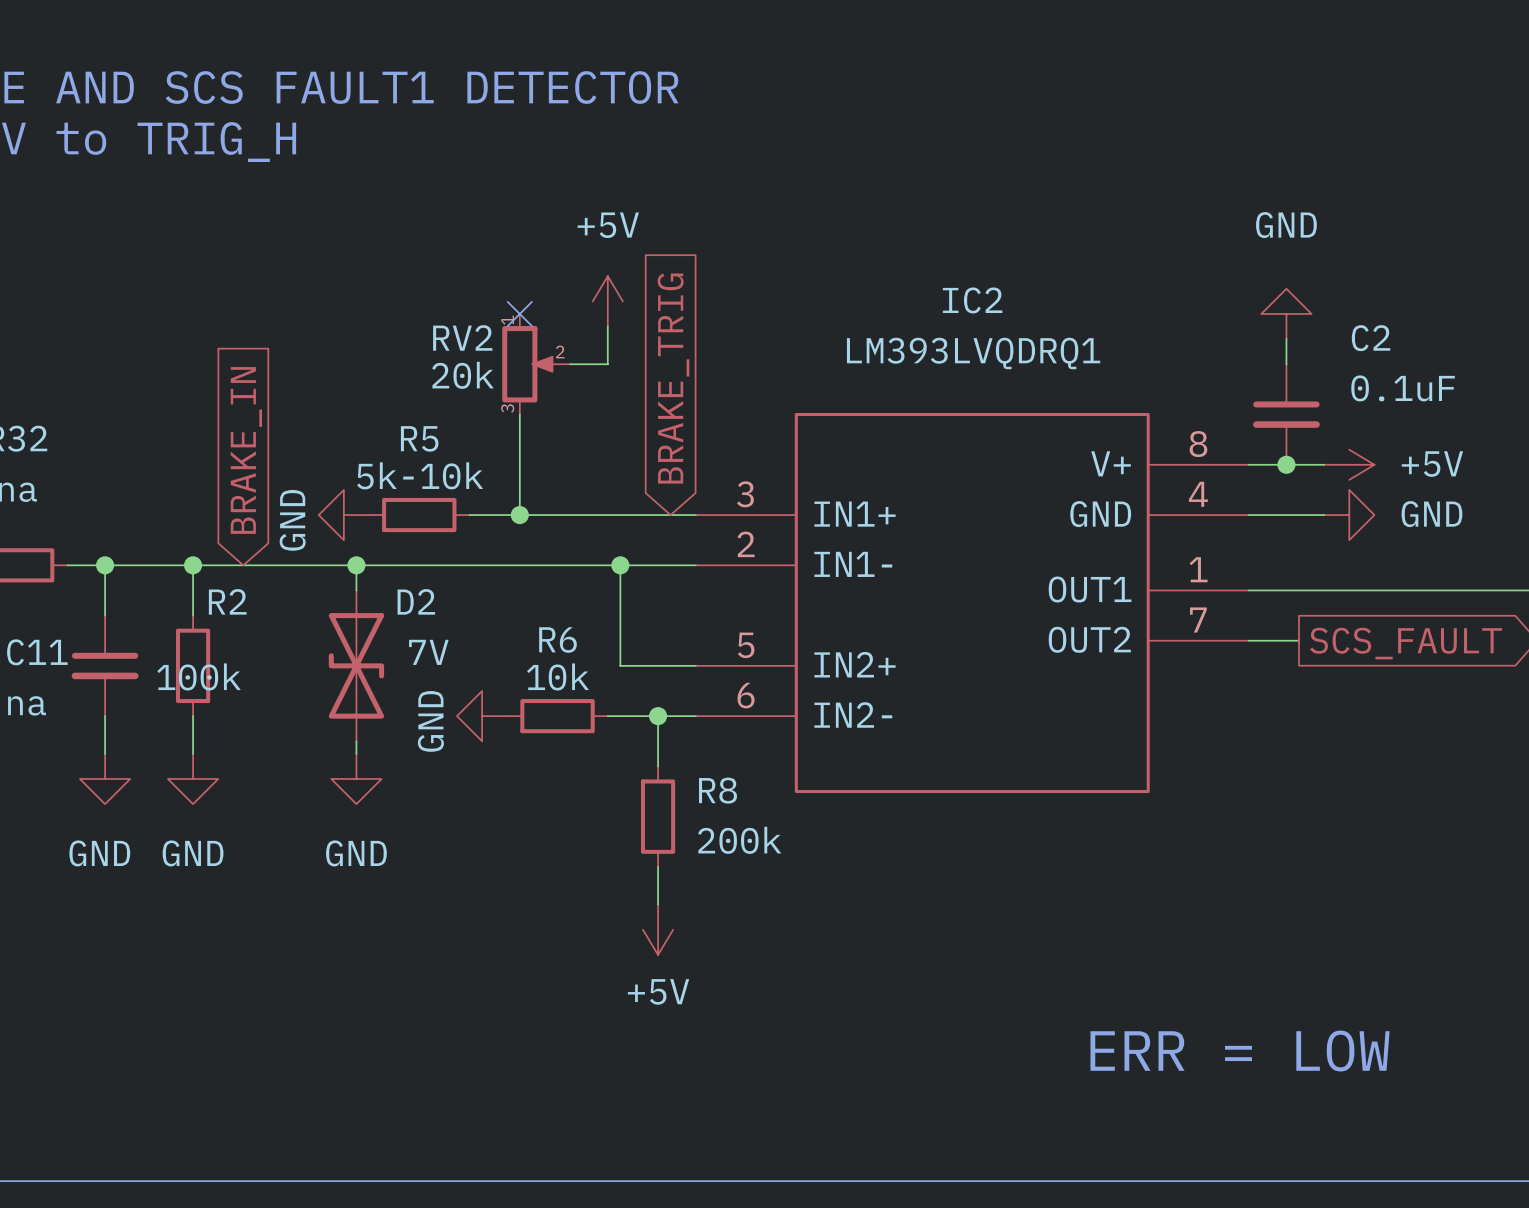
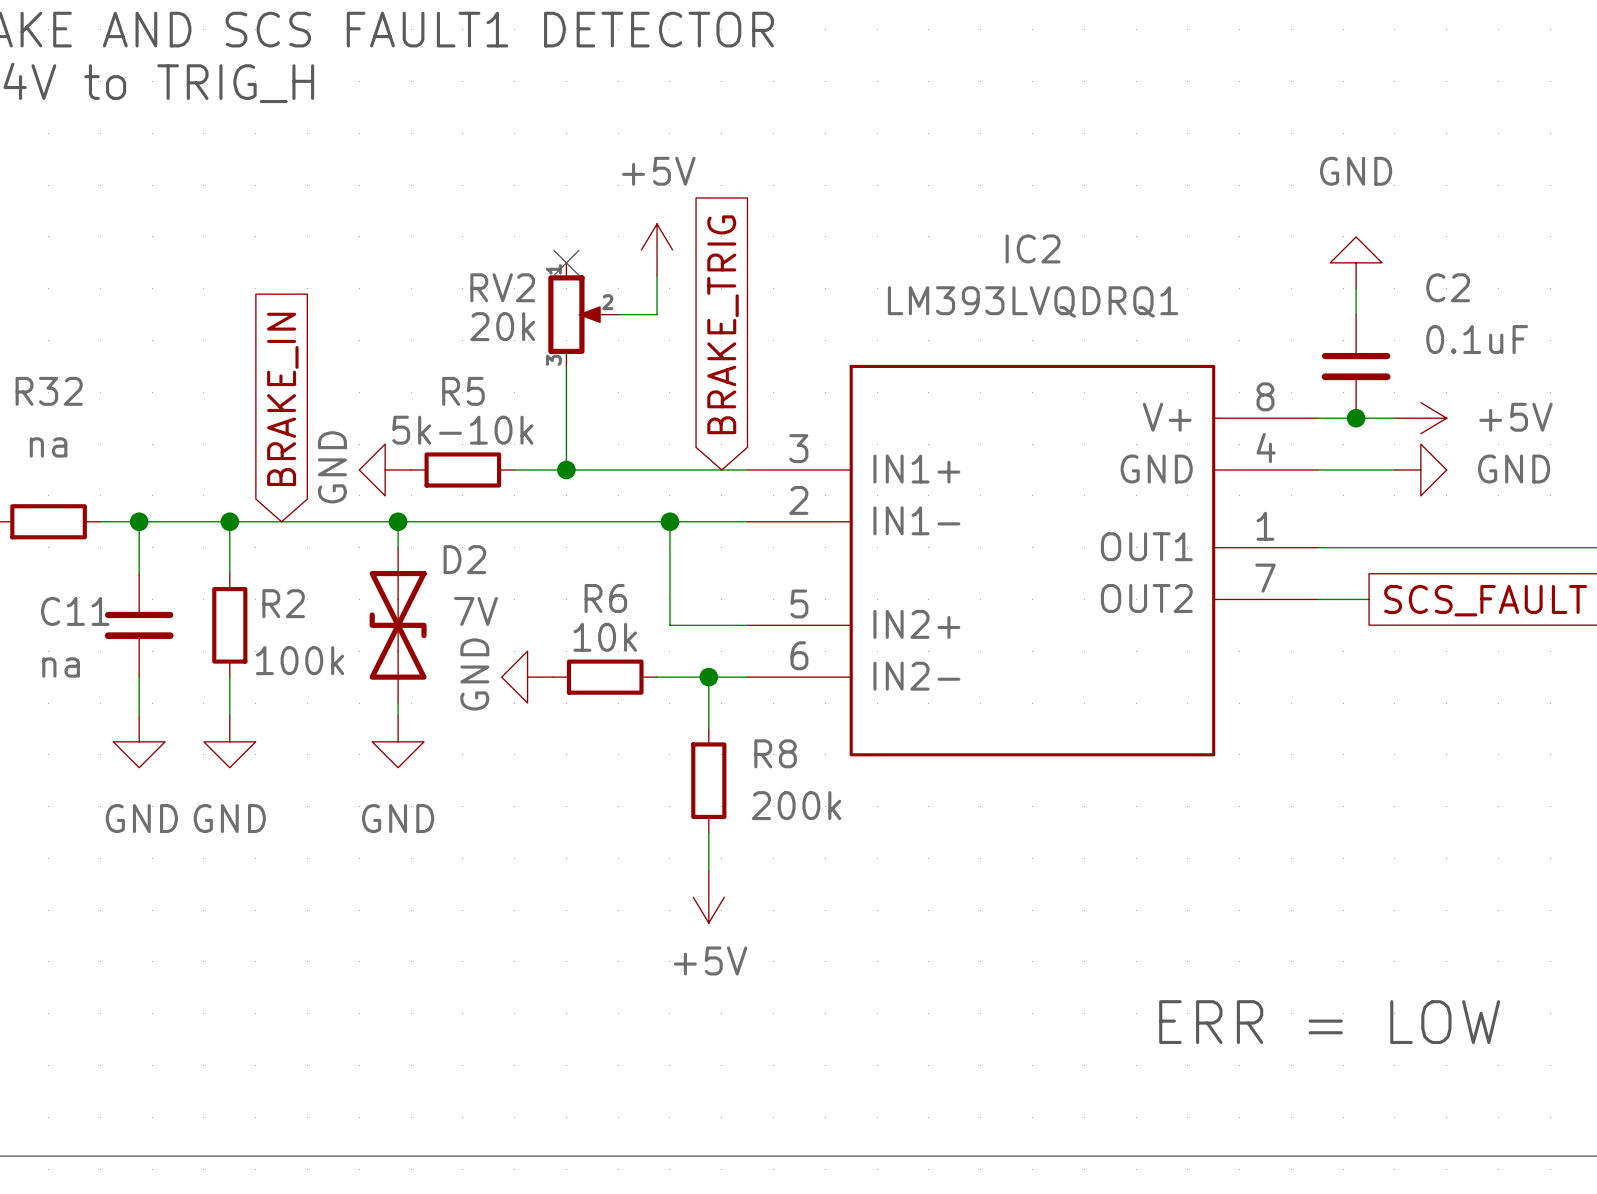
R2 name position: R2 (227, 601) -> R2 (283, 603)
R2 value position: 100k (199, 676) -> 100k (300, 660)

